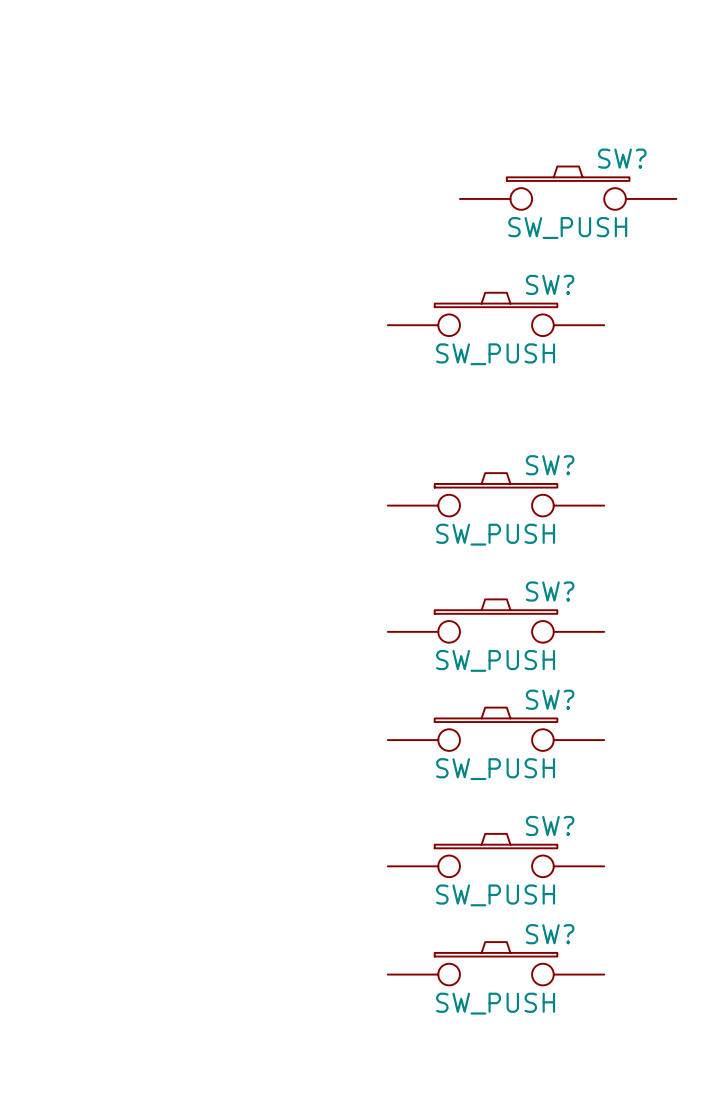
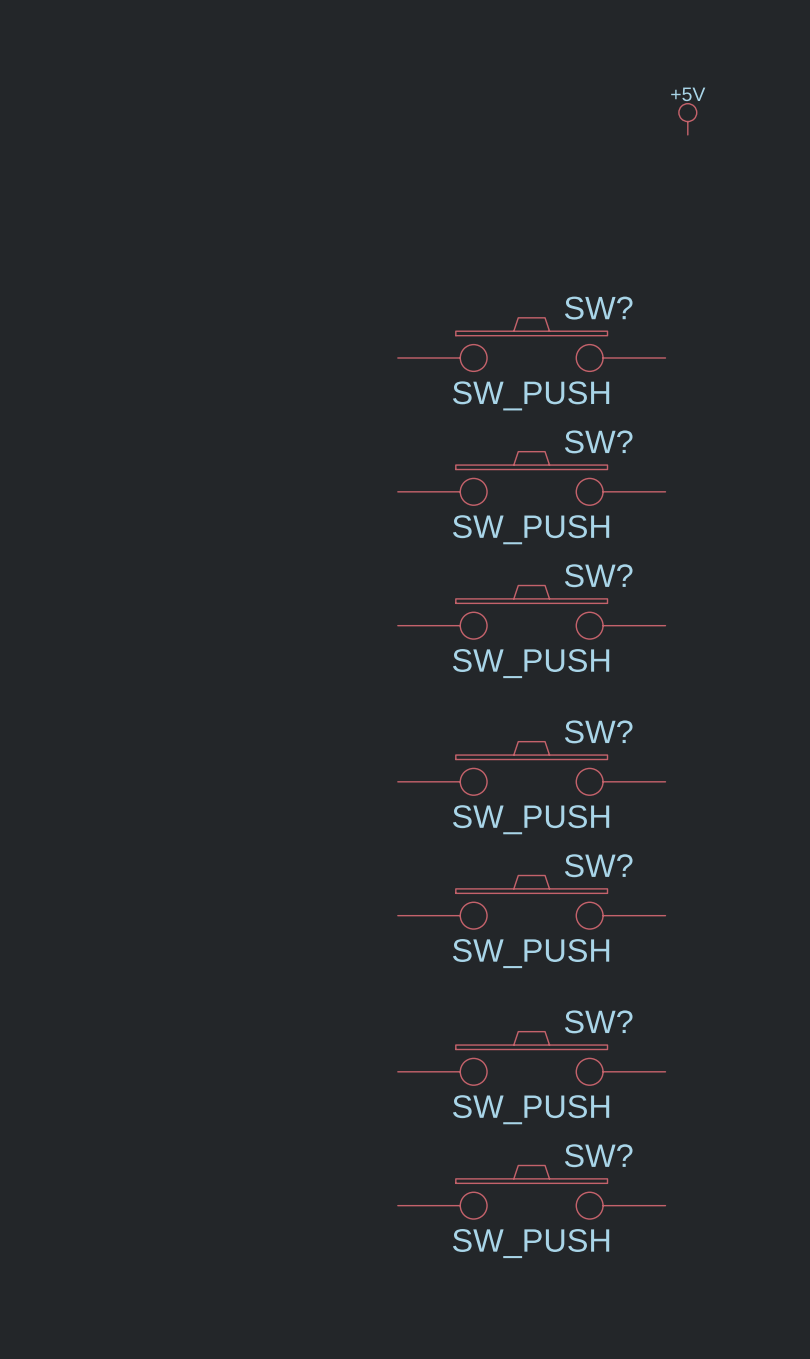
power symbol: none -> +5V (687, 119)
SW?: SW_PUSH (568, 188) -> none
SW?: none -> SW_PUSH (531, 344)
SW?: SW_PUSH (496, 314) -> none
SW?: none -> SW_PUSH (531, 478)

